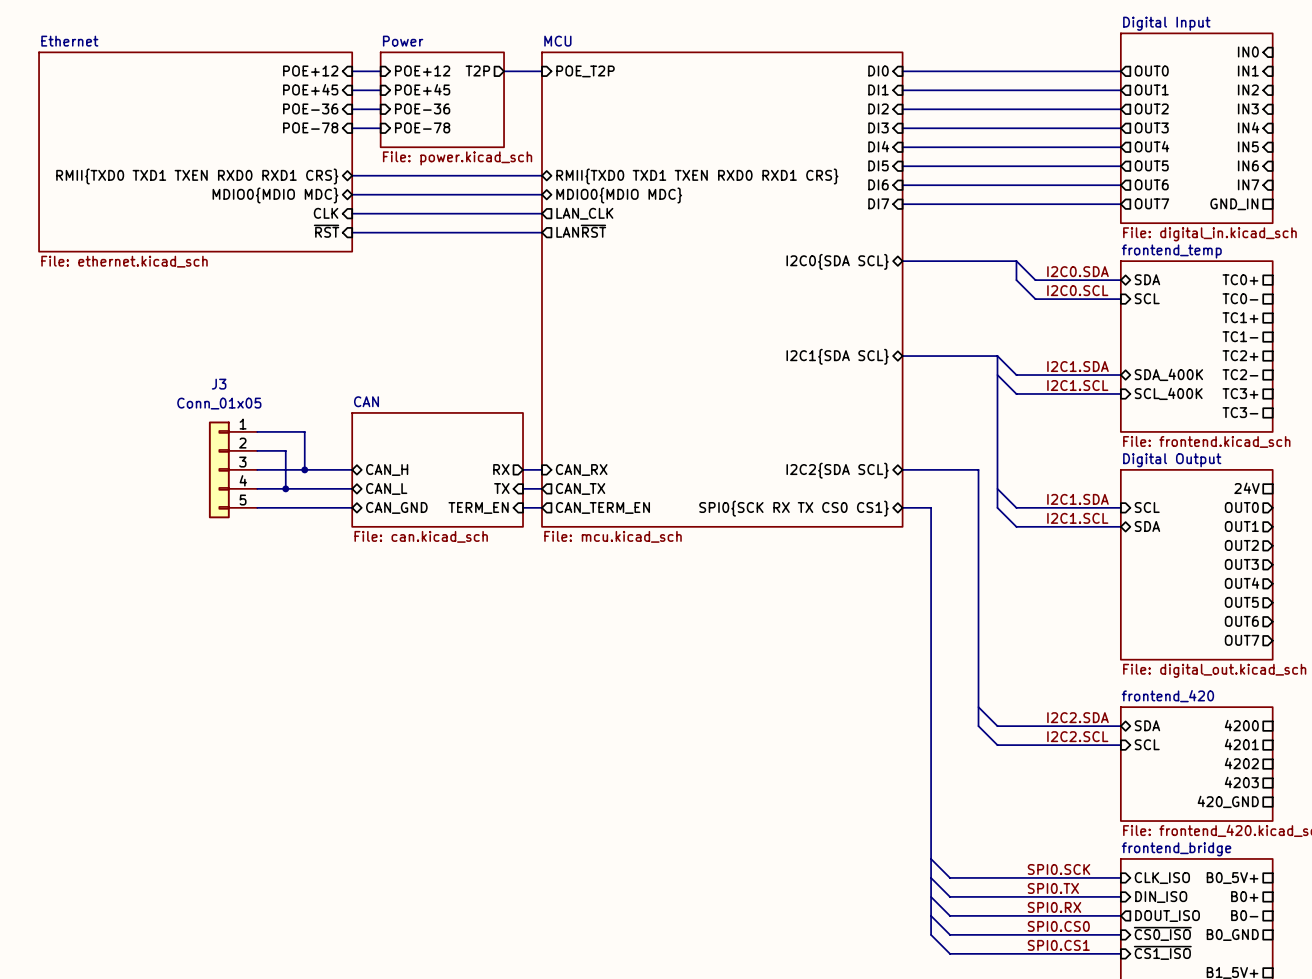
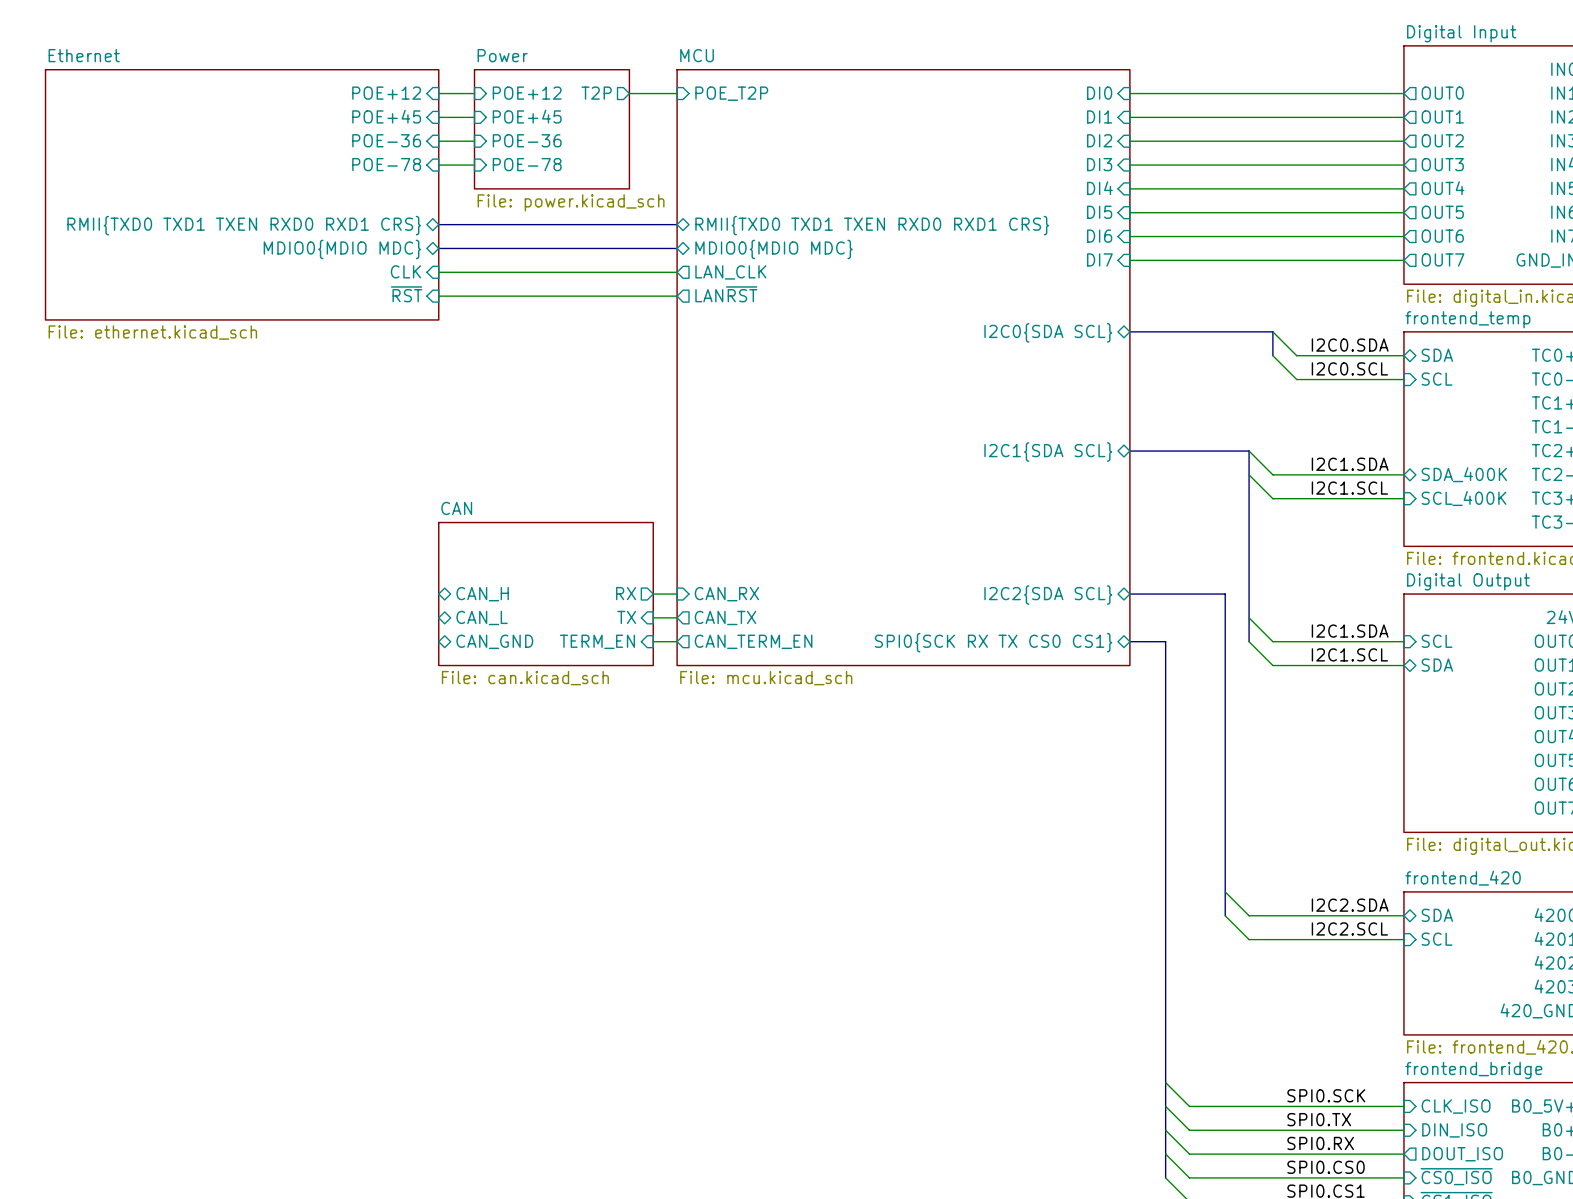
wire: (257, 431) (304, 431) (304, 469) -> none
wire: (257, 450) (285, 450) (285, 488) -> none
J3: Conn_01x05 (233, 469) -> none
wire: (257, 469) (352, 469) -> none
junction: (304, 469) -> none
wire: (257, 488) (352, 488) -> none
junction: (285, 488) -> none
wire: (257, 507) (352, 507) -> none

